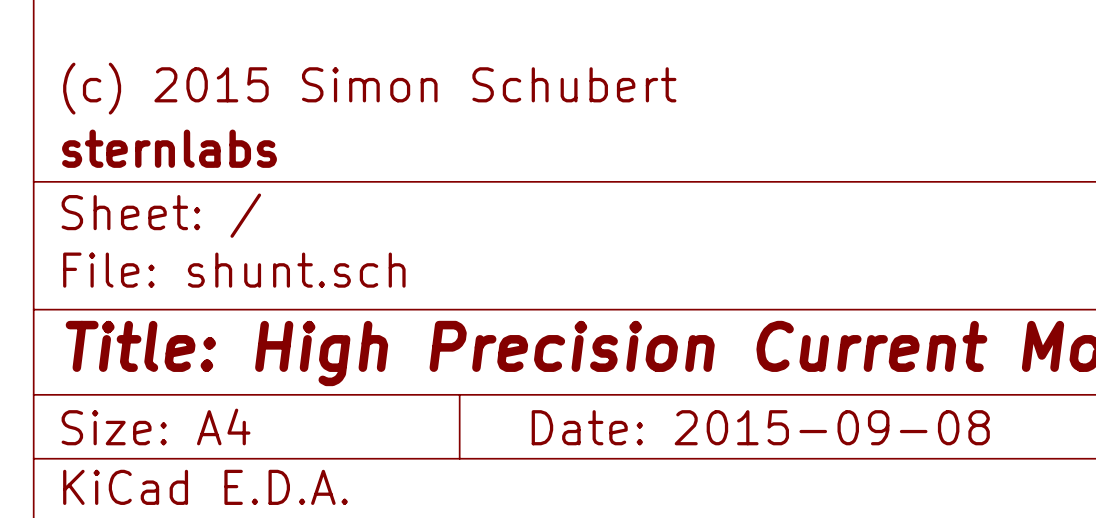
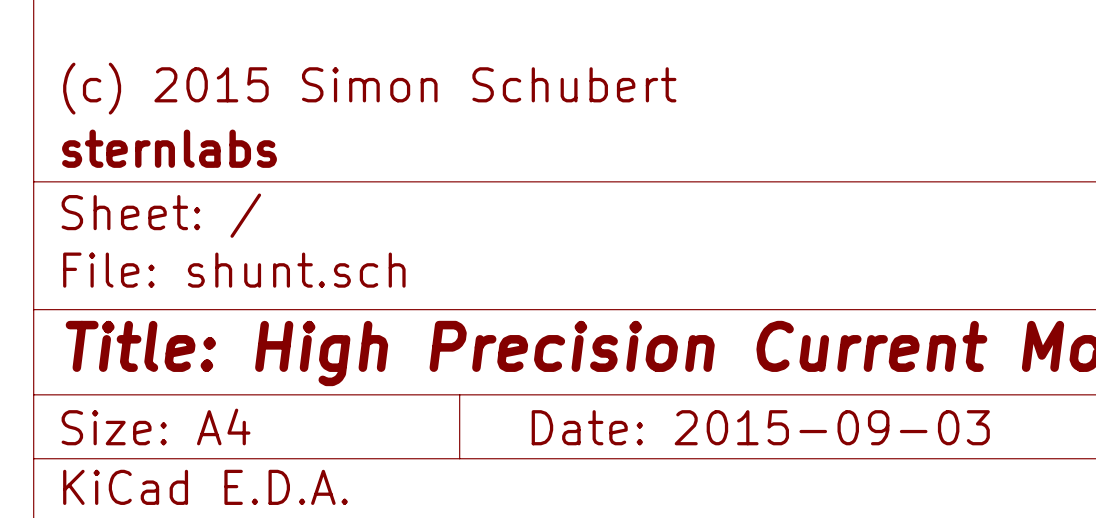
title block: Date: 2015-09-08 (760, 427) -> Date: 2015-09-03 (760, 427)

